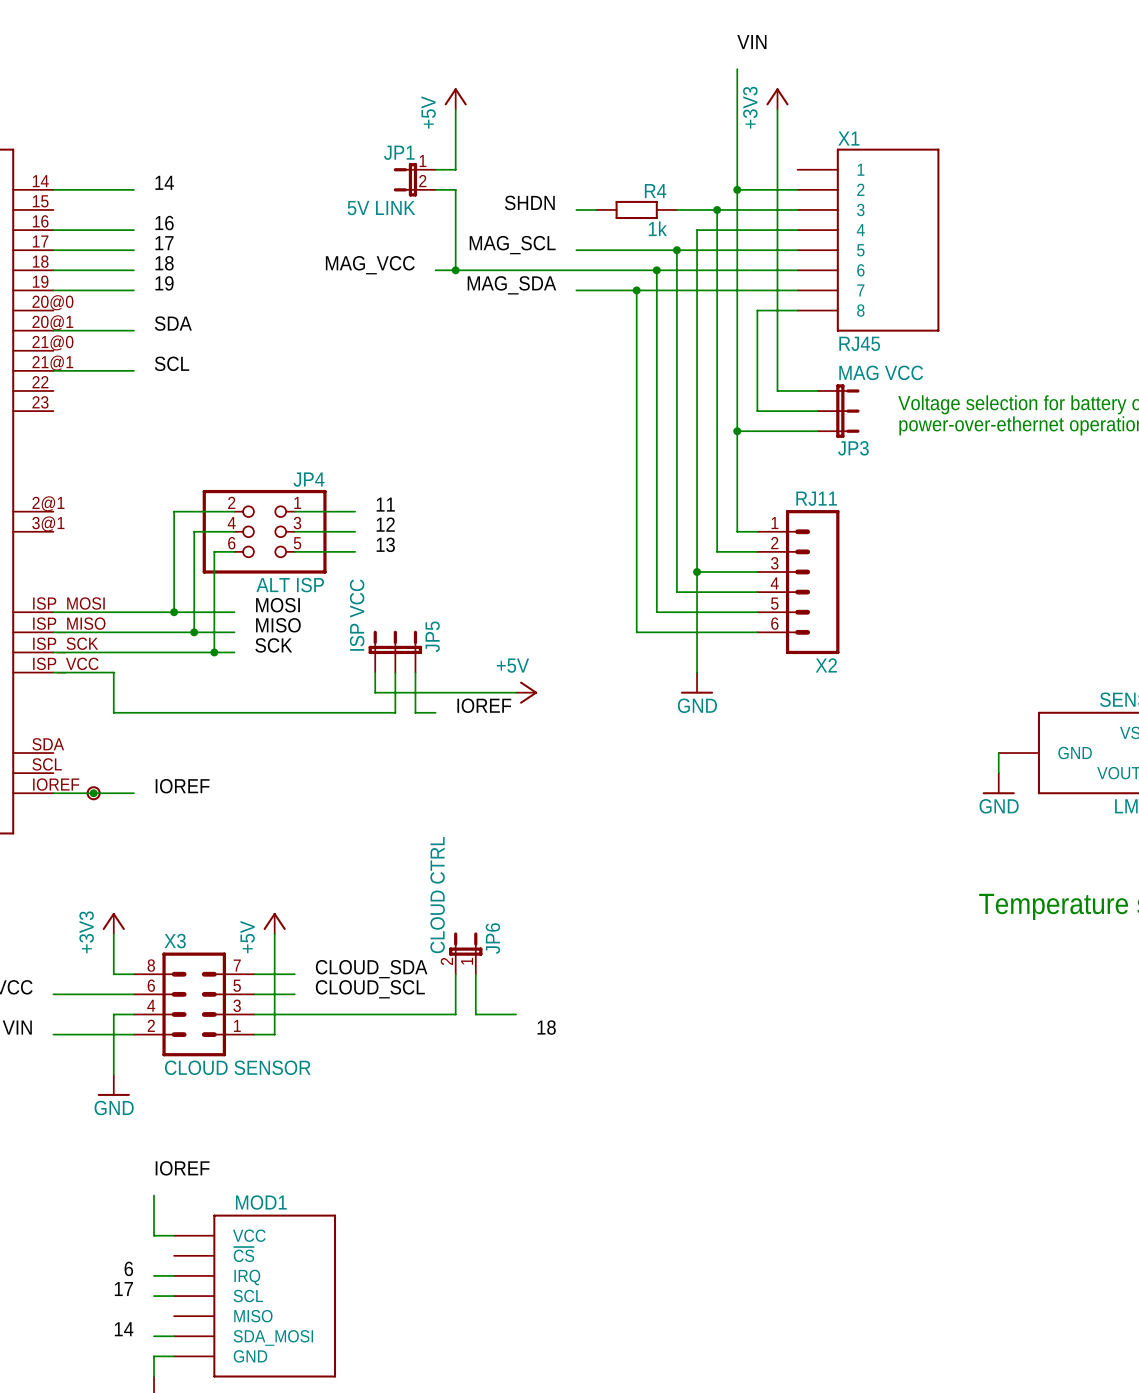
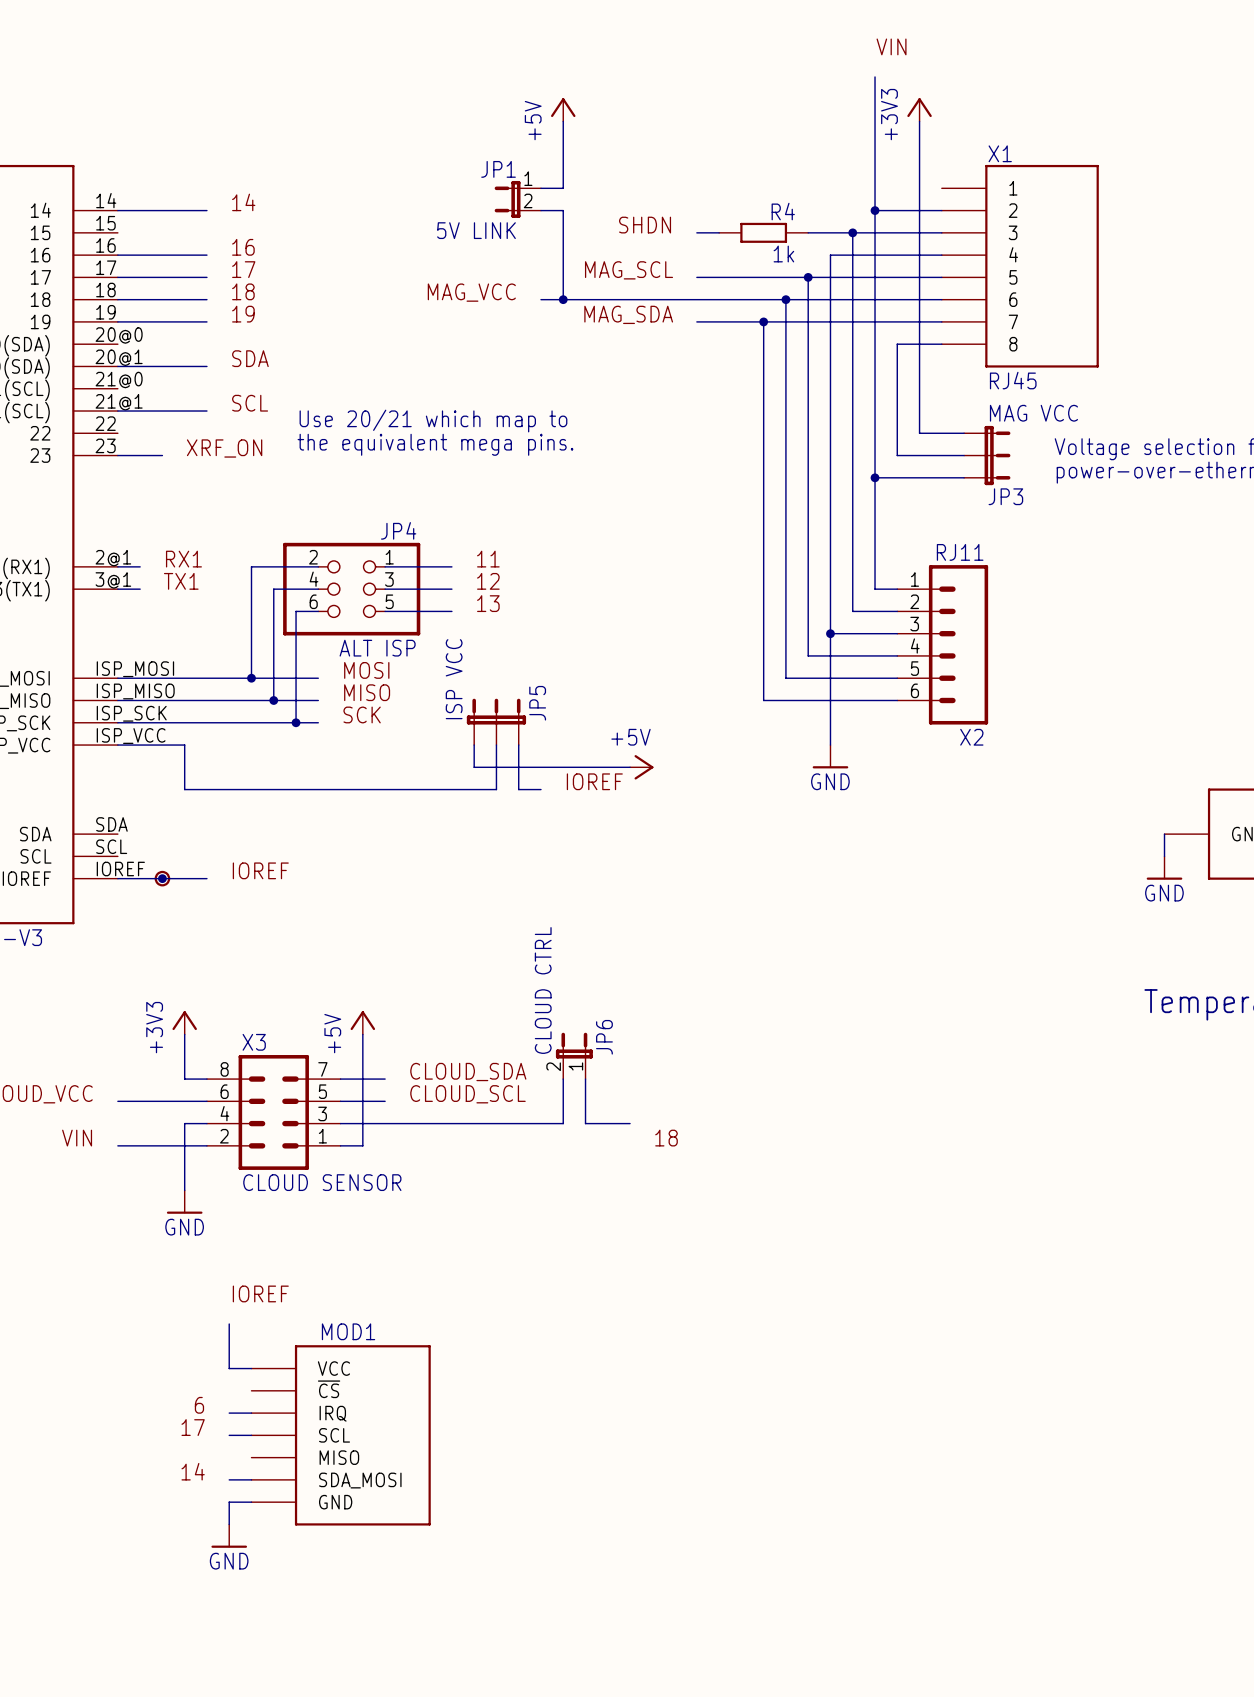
text: none -> Use 20/21 which map to (433, 421)
text: none -> the equivalent mega pins. (435, 444)
label: none -> XRF_ON (224, 448)
wire: none -> (117, 455) (162, 455)
label: none -> RX1 (183, 559)
wire: none -> (117, 566) (140, 566)
label: none -> TX1 (181, 581)
wire: none -> (117, 589) (140, 589)

